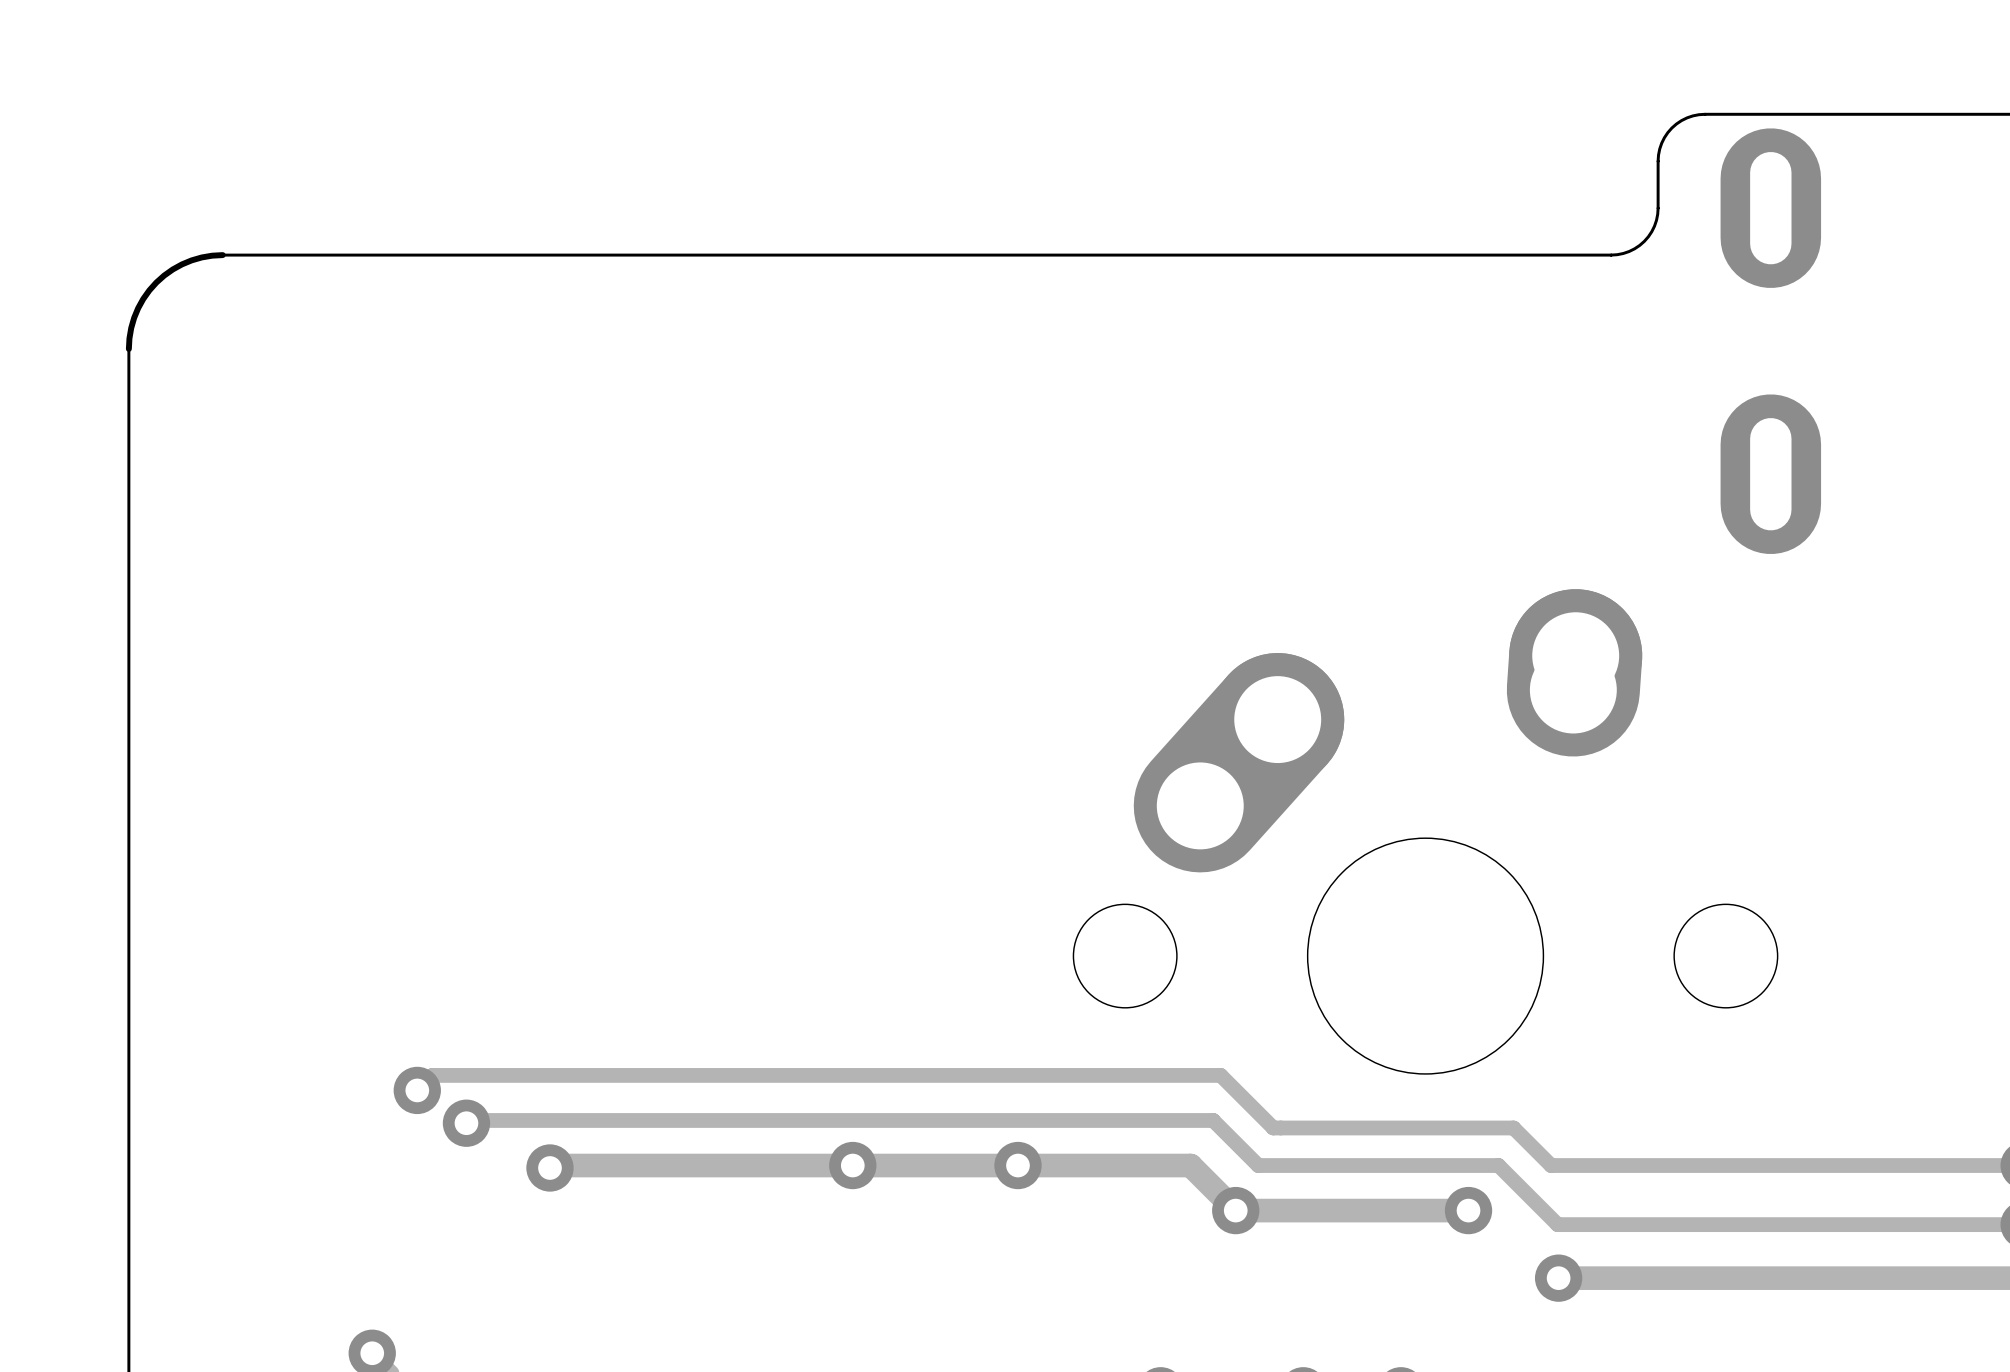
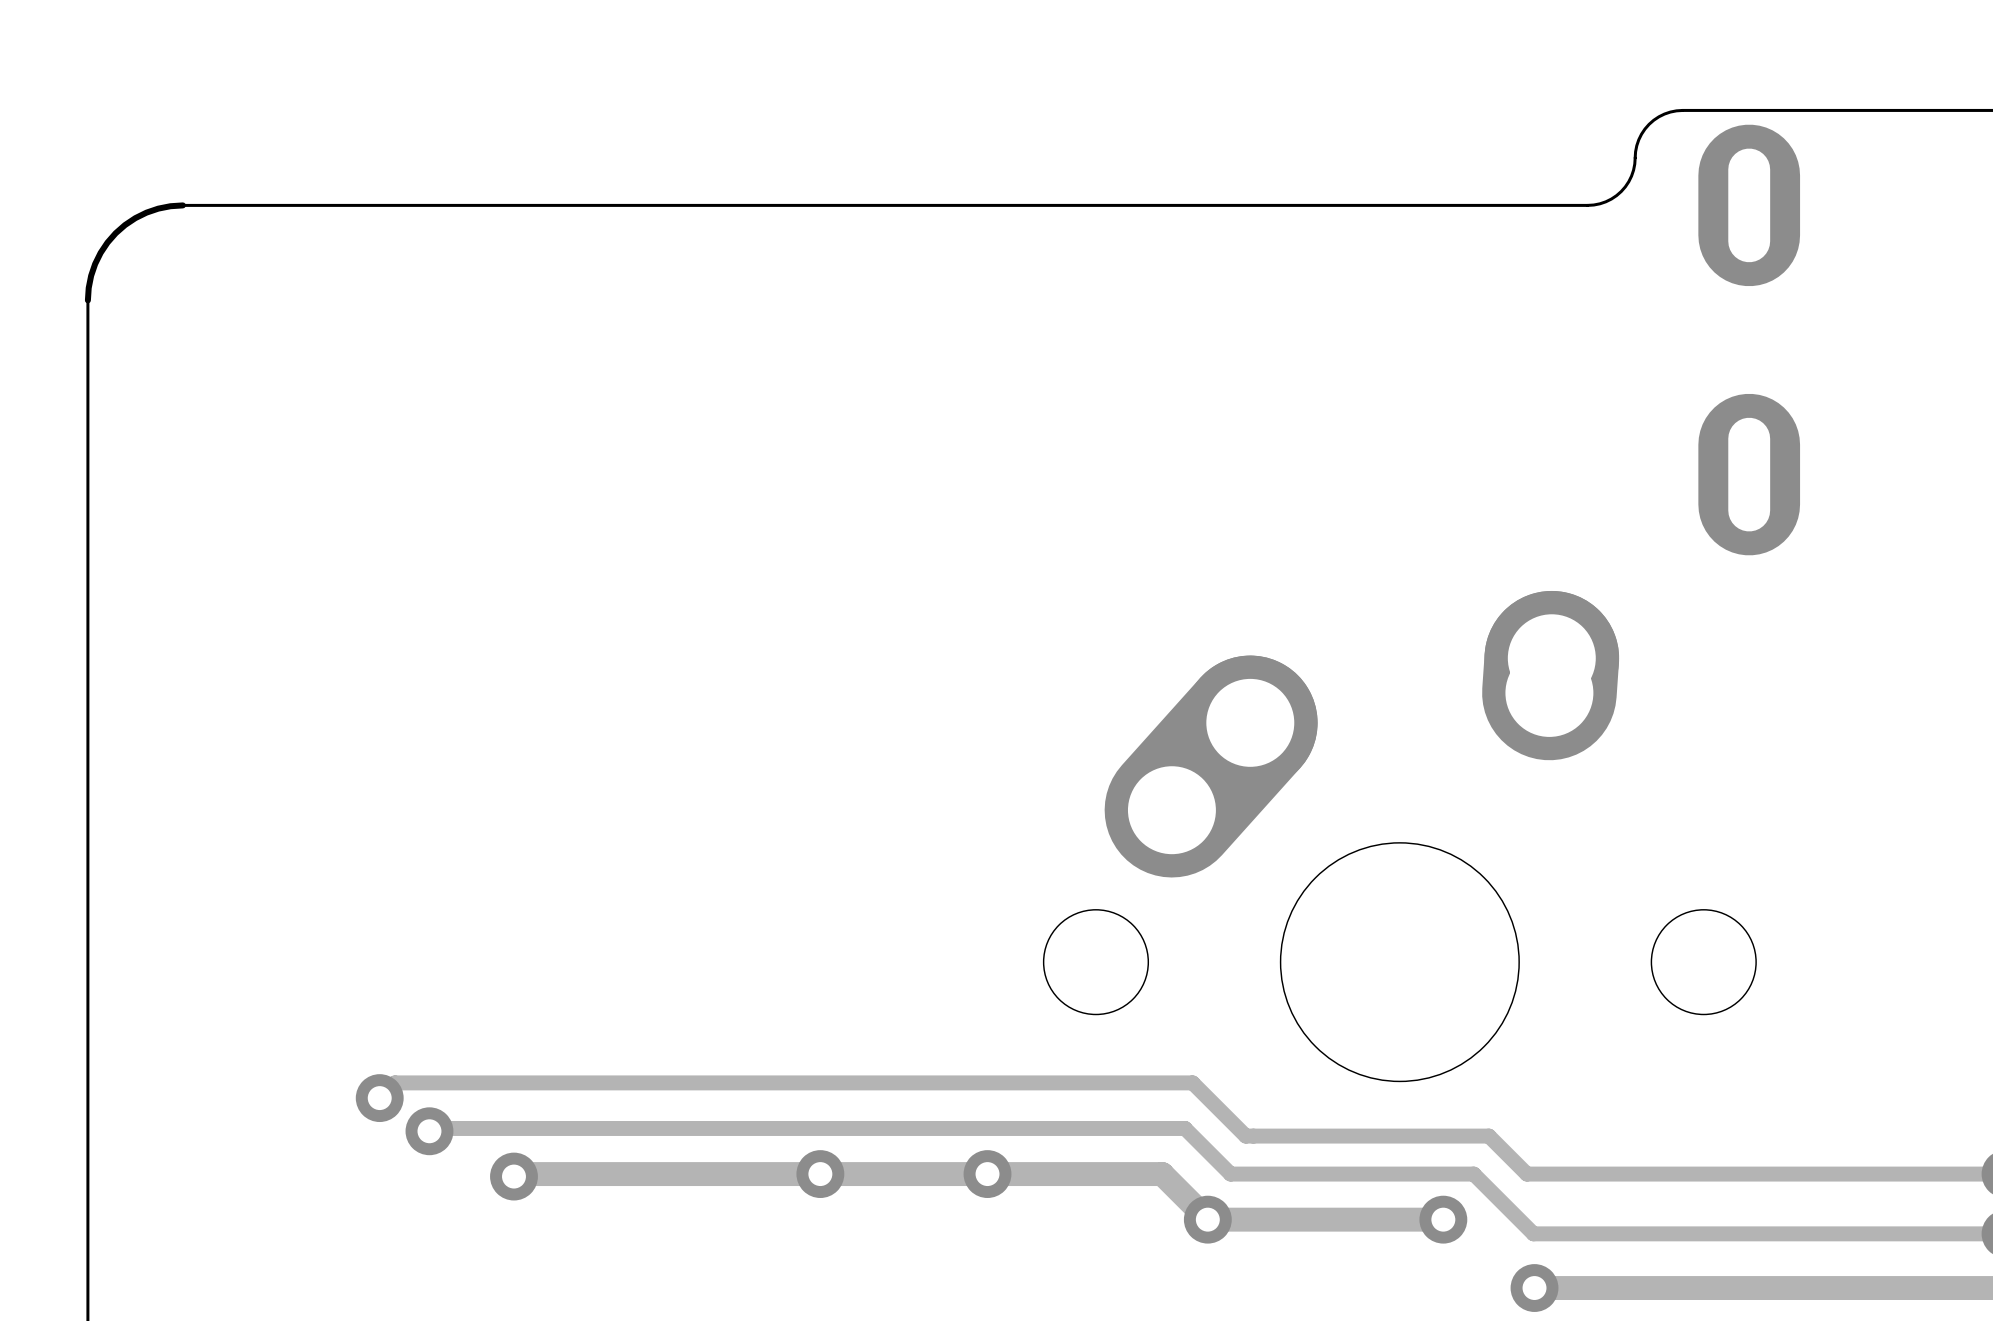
board edge: (1658, 161) (1658, 208) (1654, 226) (1648, 236) (1639, 245) (1629, 251) (1617, 254) (212, 255) (182, 264) (156, 282) (138, 308) (131, 328) (128, 348) -> (1635, 157) (1631, 176) (1621, 191) (1605, 201) (1587, 205) (170, 206) (146, 212) (135, 218) (115, 233) (100, 252) (91, 275) (88, 287) (87, 347)

